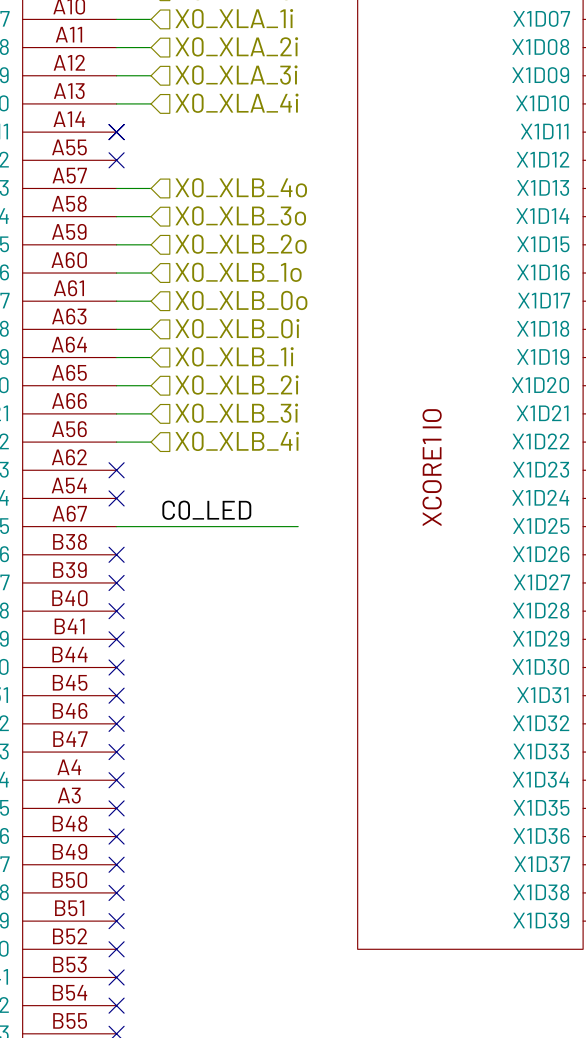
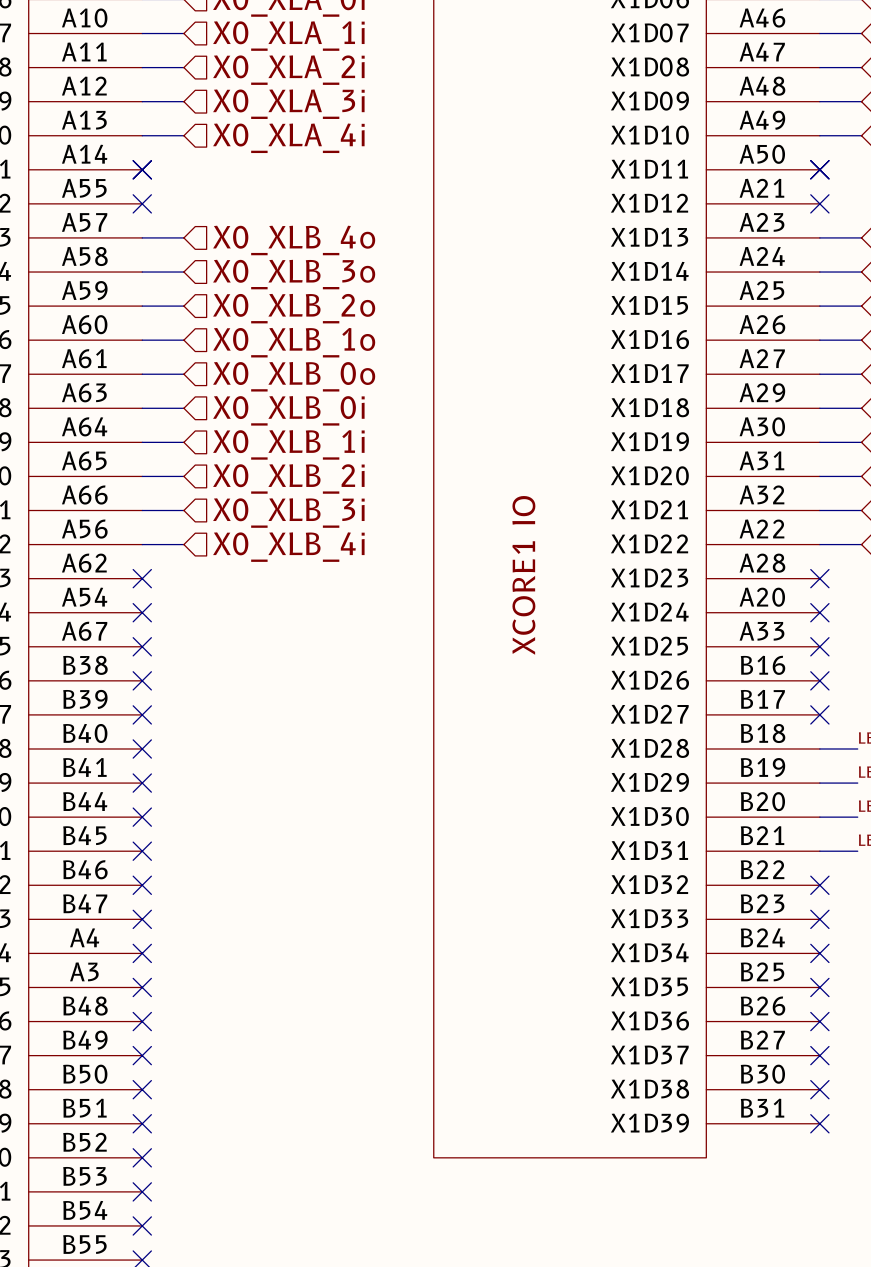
label: C0_LED (206, 510) -> none
wire: (116, 526) (298, 526) -> none
no-connect mark: none -> (142, 646)

